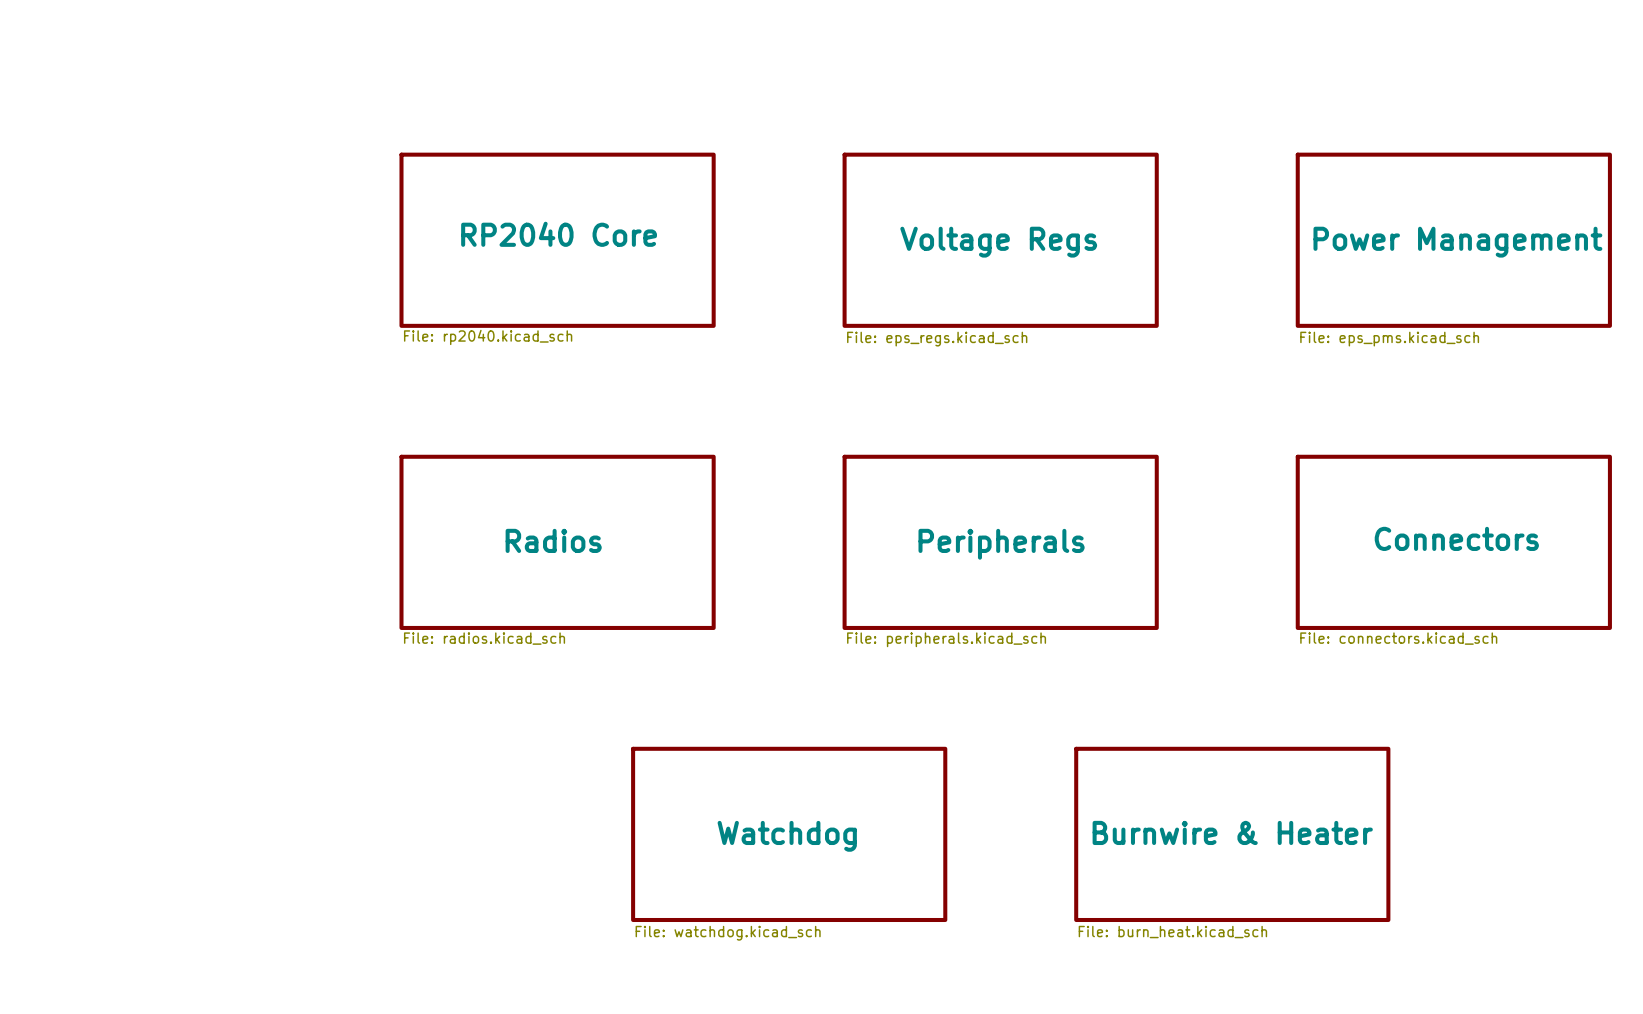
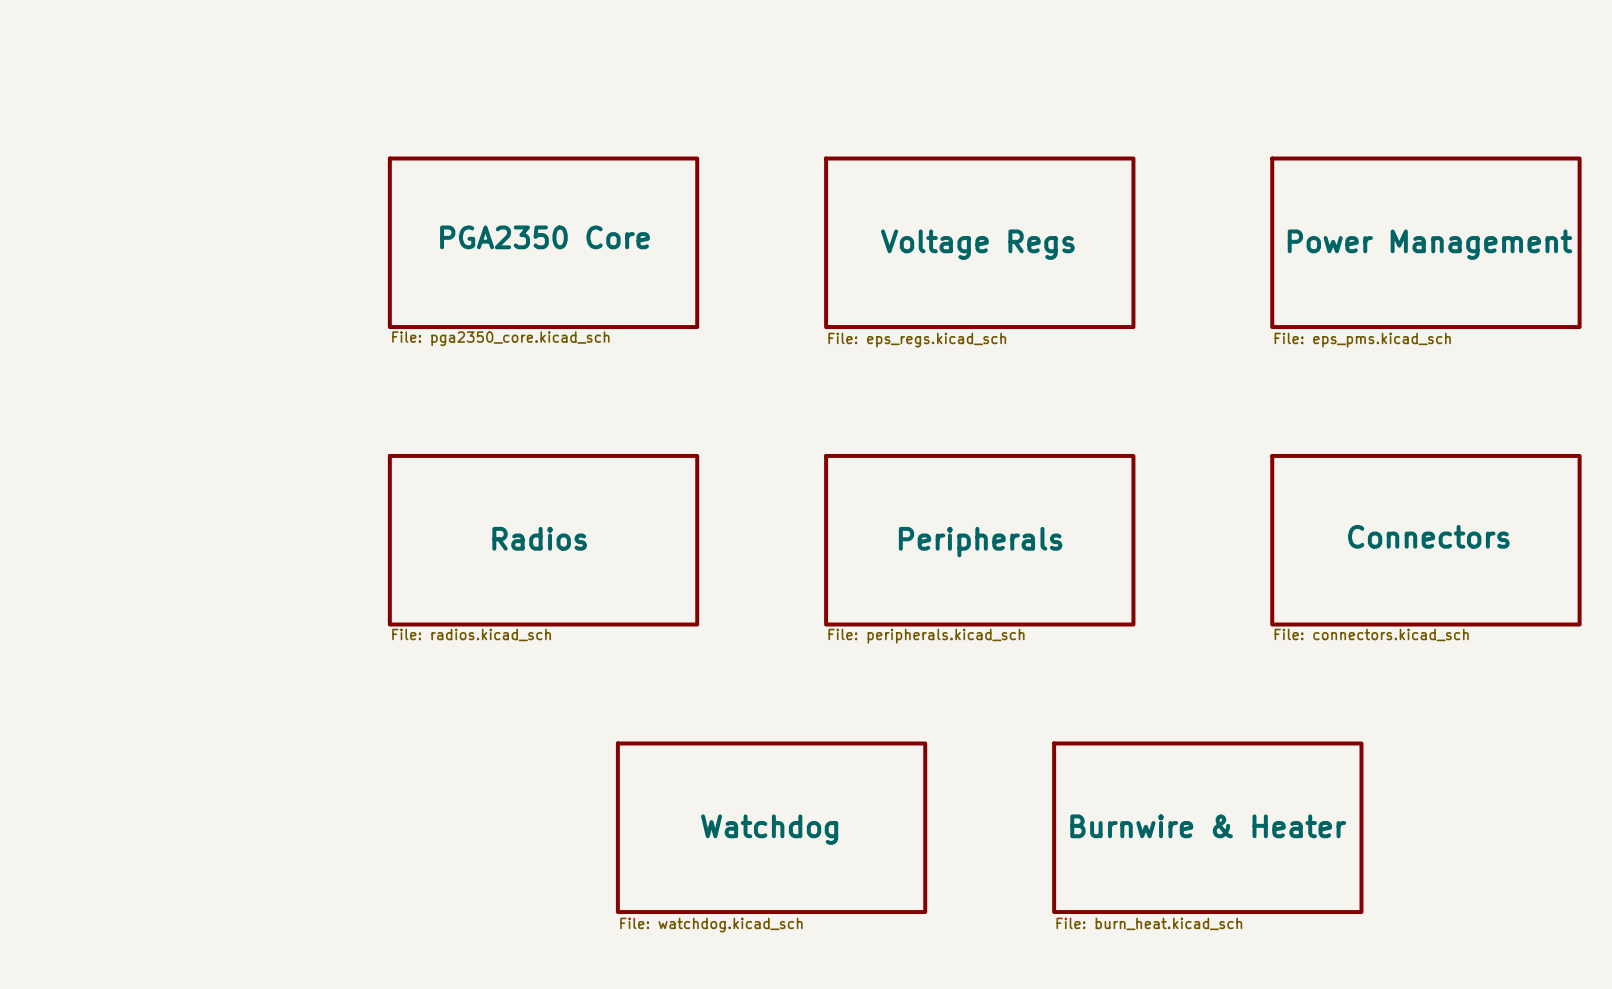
sheet RP2040 Core name: RP2040 Core (559, 234) -> PGA2350 Core (544, 237)
sheet RP2040 Core value: File: rp2040.kicad_sch (488, 337) -> File: pga2350_core.kicad_sch (500, 338)

